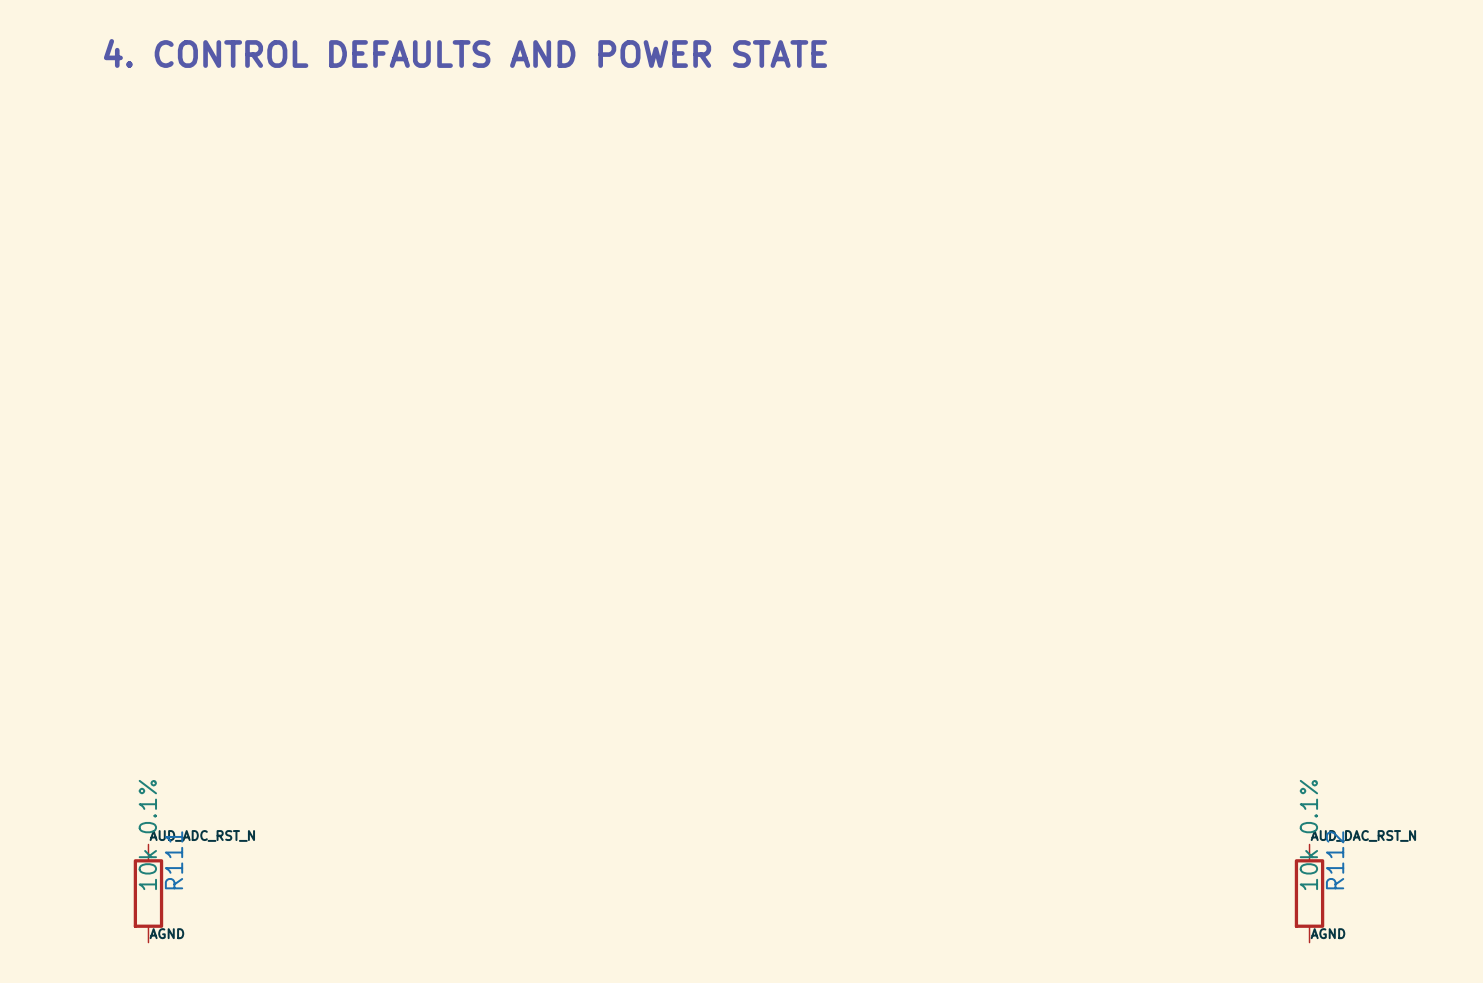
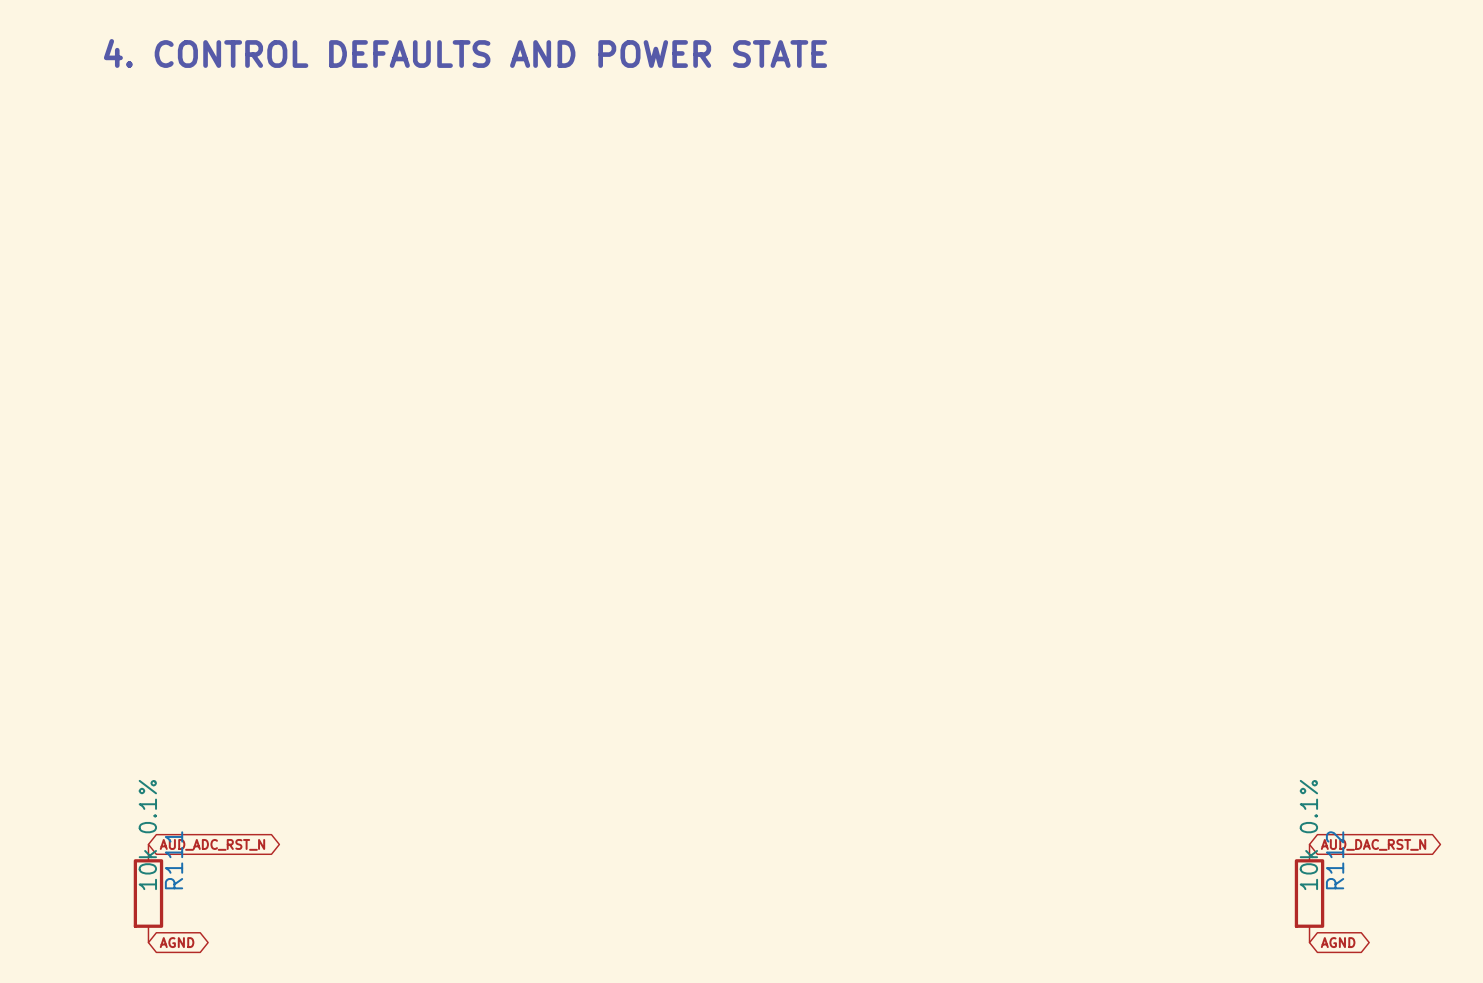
label: AUD_ADC_RST_N (202, 835) -> none
label: AUD_DAC_RST_N (1363, 835) -> none
global label: none -> AUD_ADC_RST_N (212, 844)
global label: none -> AUD_DAC_RST_N (1373, 844)
label: AGND (166, 933) -> none
label: AGND (1327, 933) -> none
global label: none -> AGND (177, 942)
global label: none -> AGND (1338, 942)

